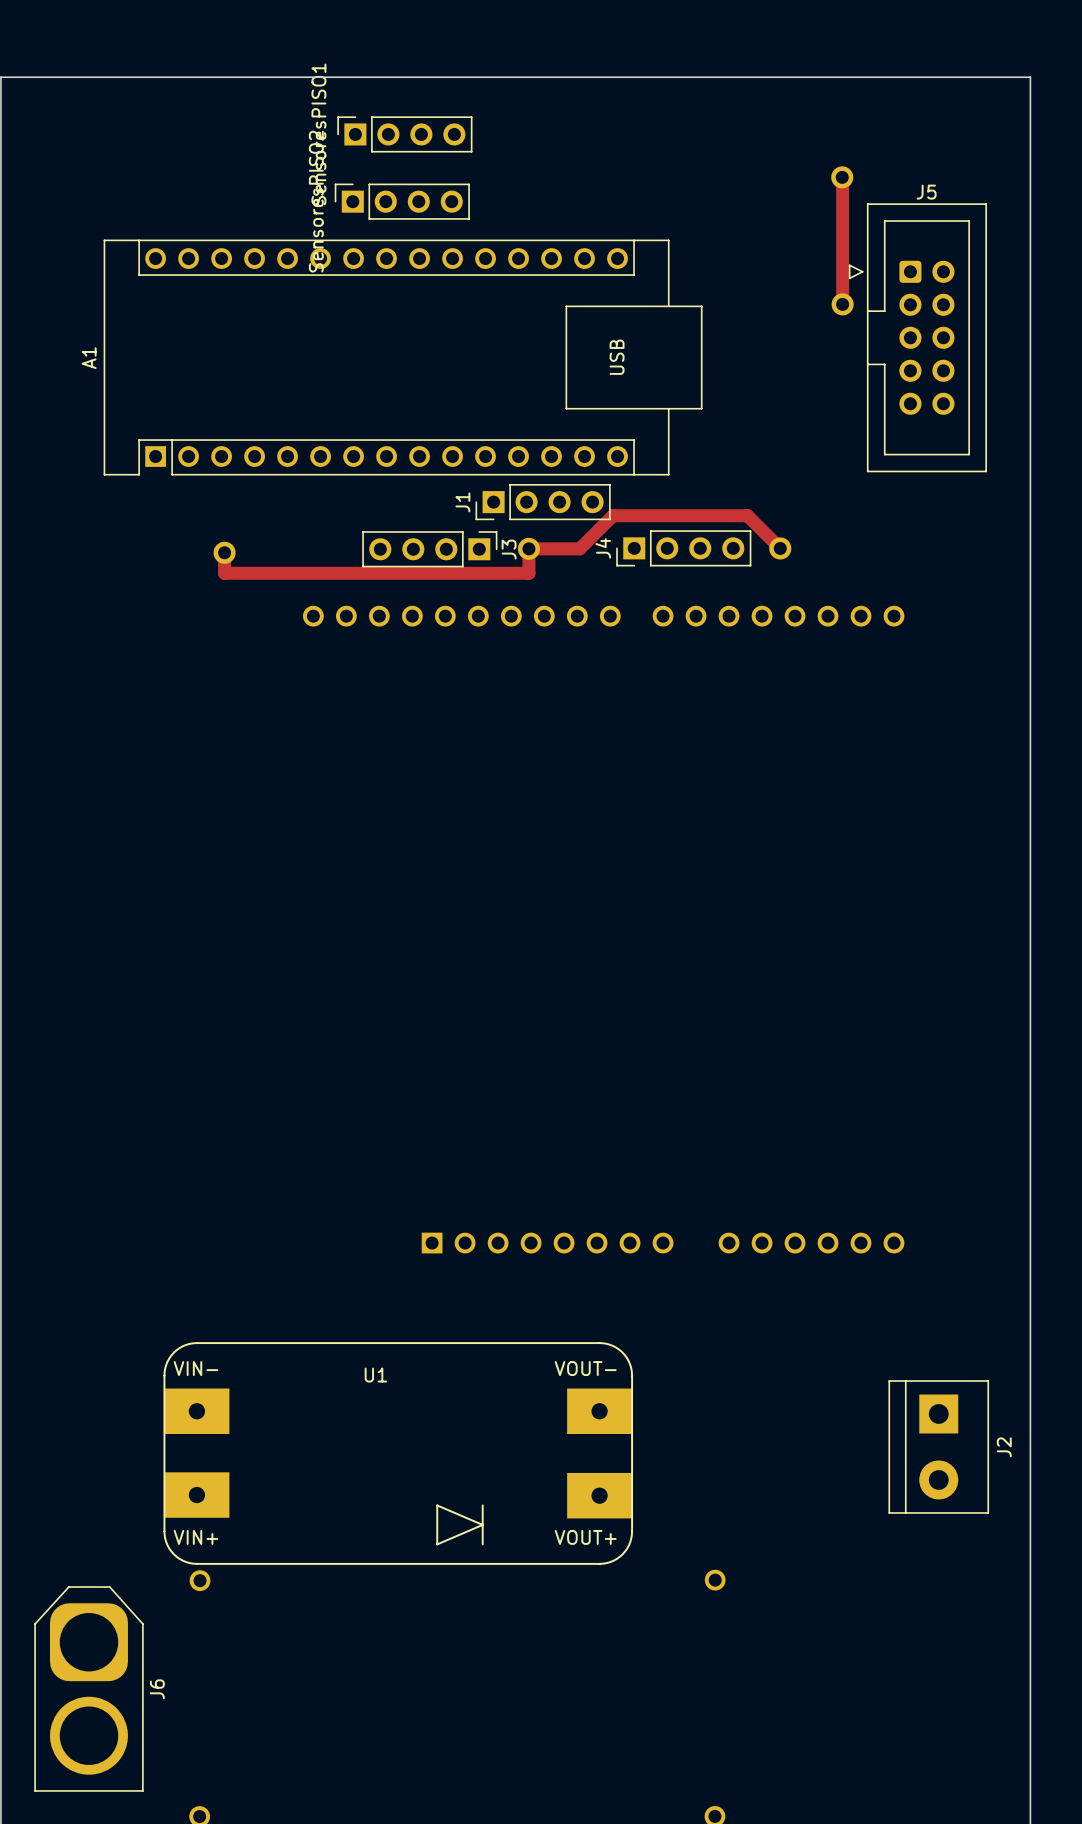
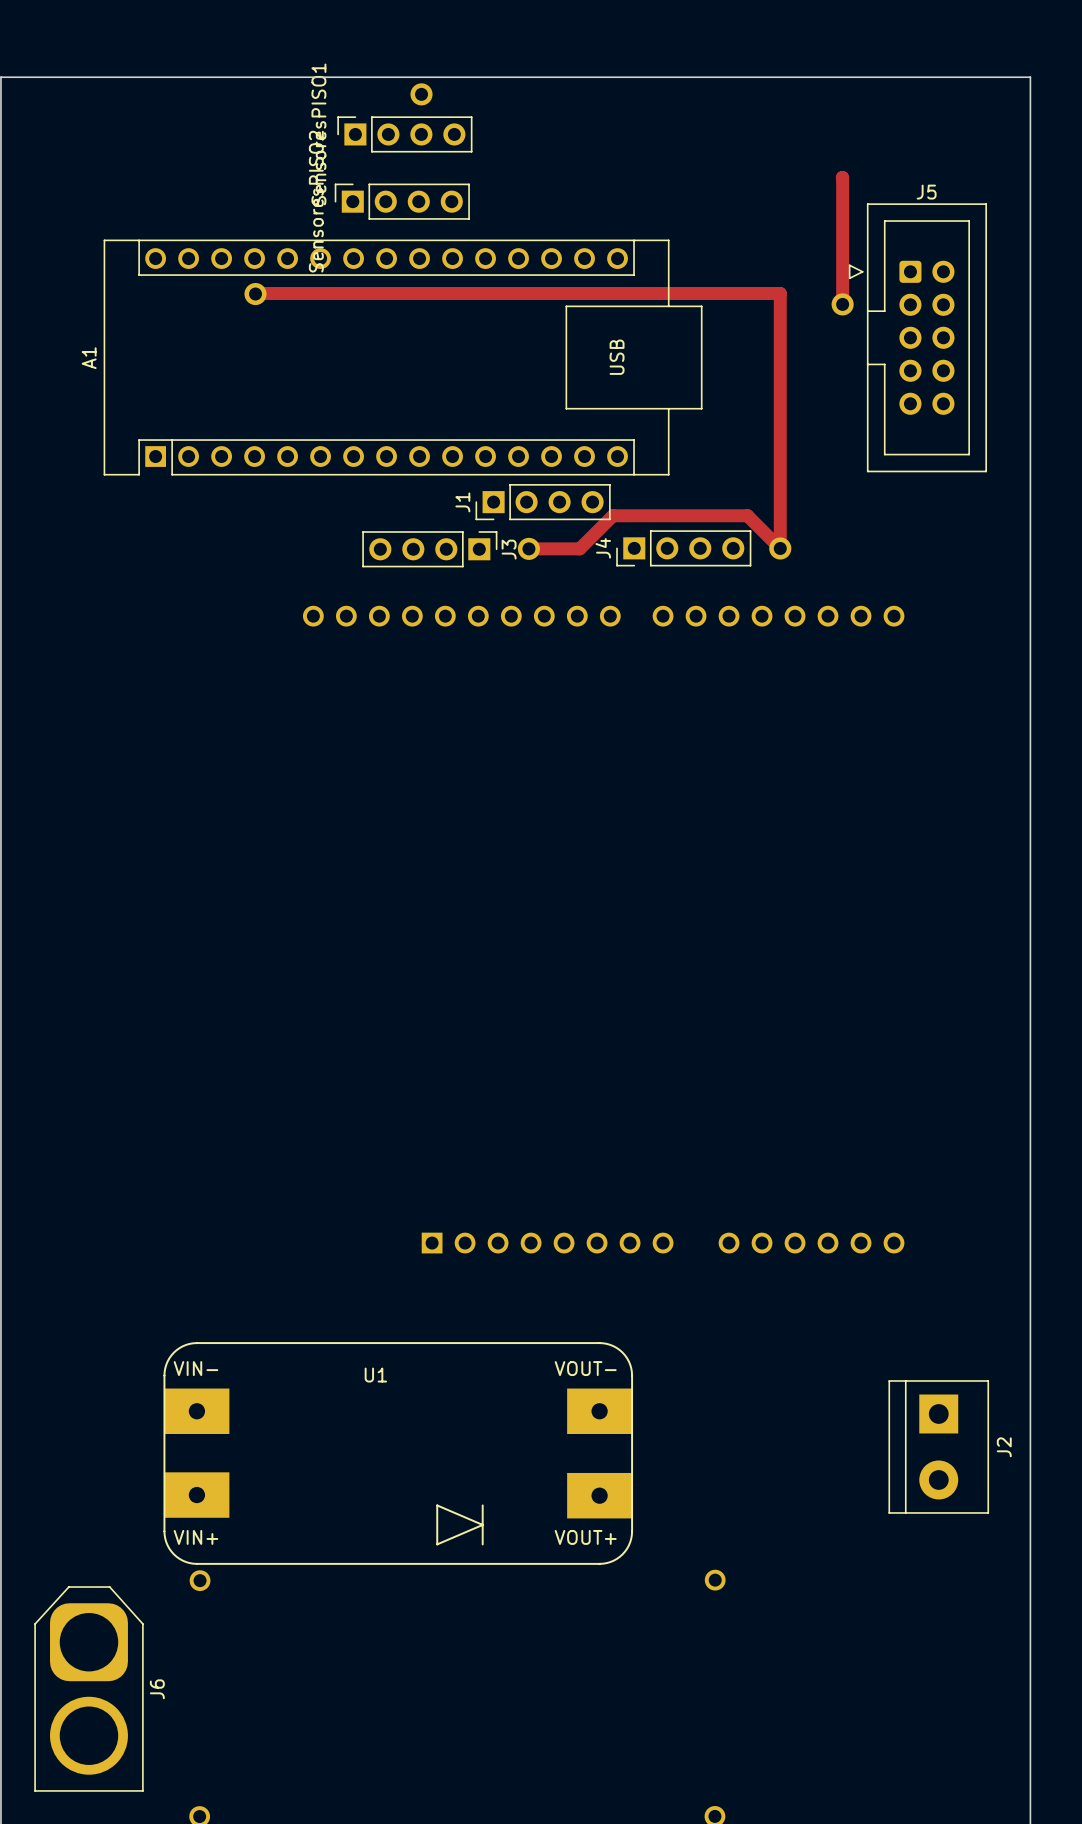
part: none -> (421, 94)
part: (842, 177) -> none
track: none -> (256, 293) (780, 293) (780, 548)
part: none -> (255, 294)
track: (528, 548) (528, 573) (224, 573) (224, 552) -> none
part: (224, 552) -> none

